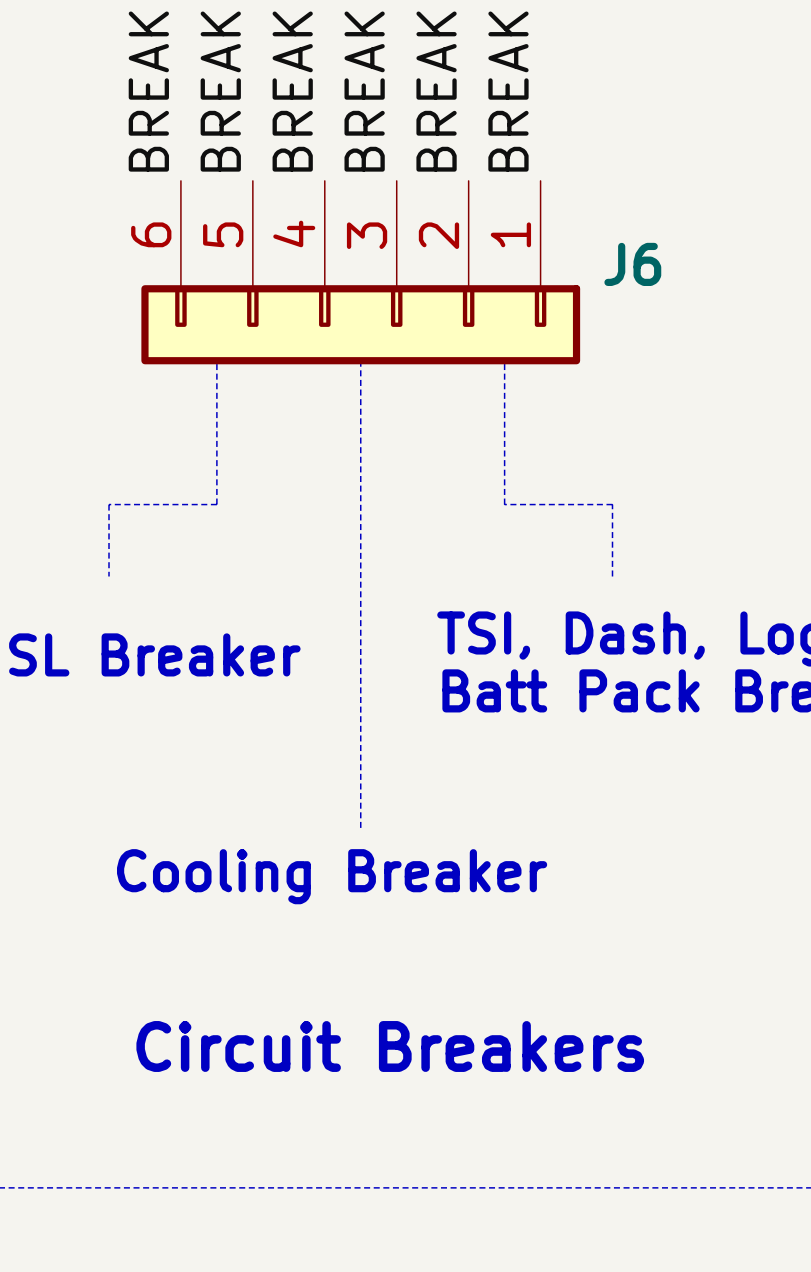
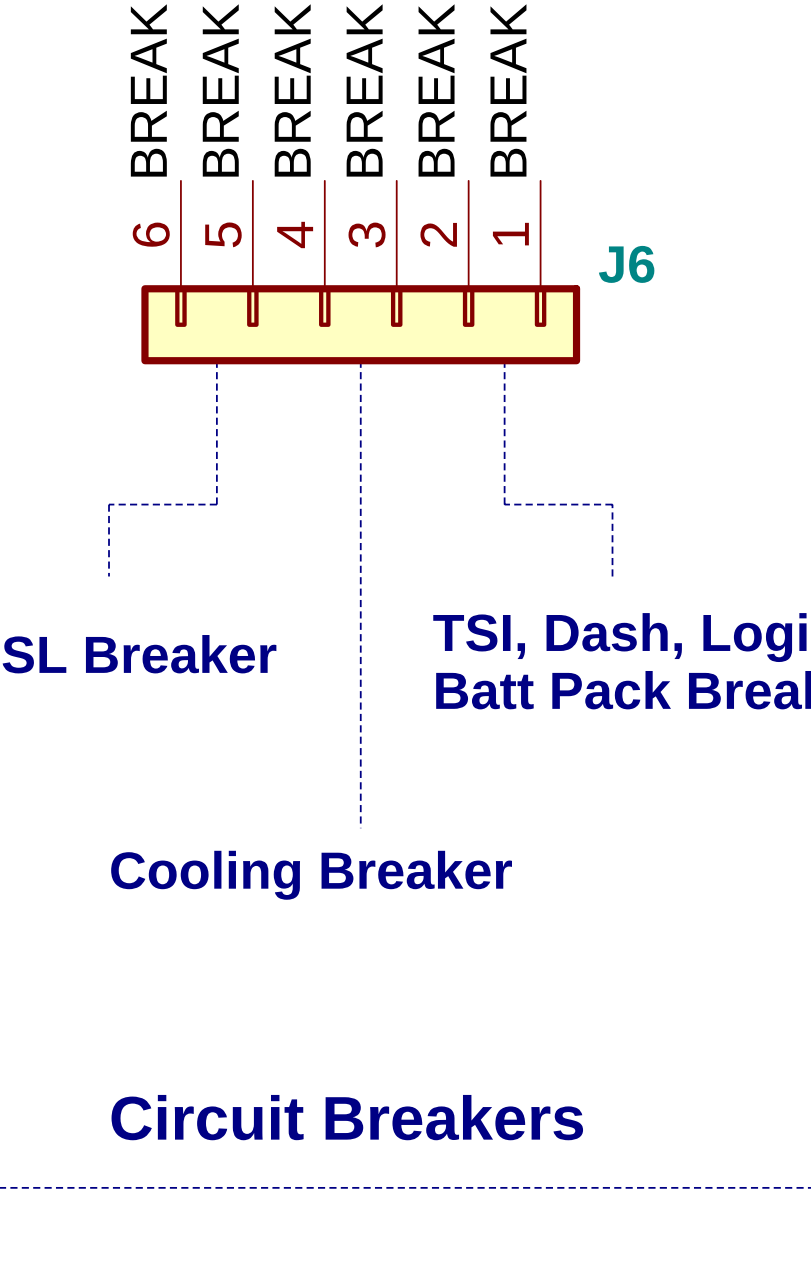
text position: Circuit Breakers (390, 1046) -> Circuit Breakers (347, 1117)

